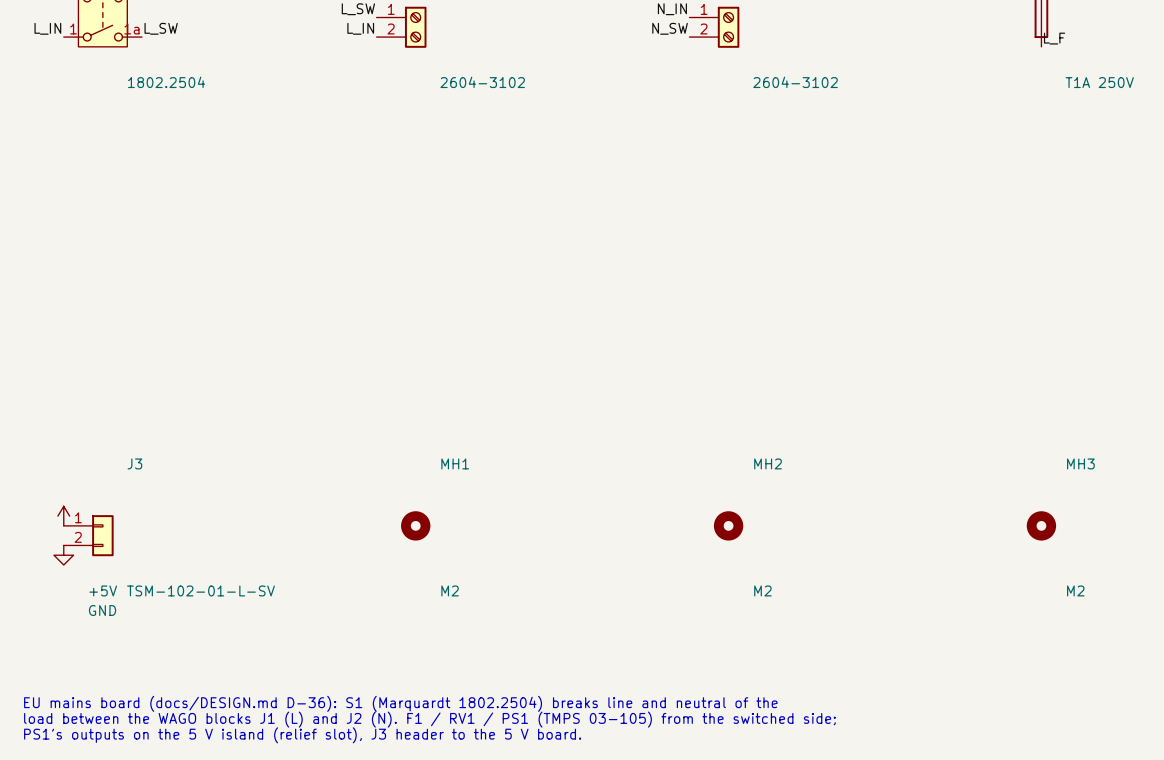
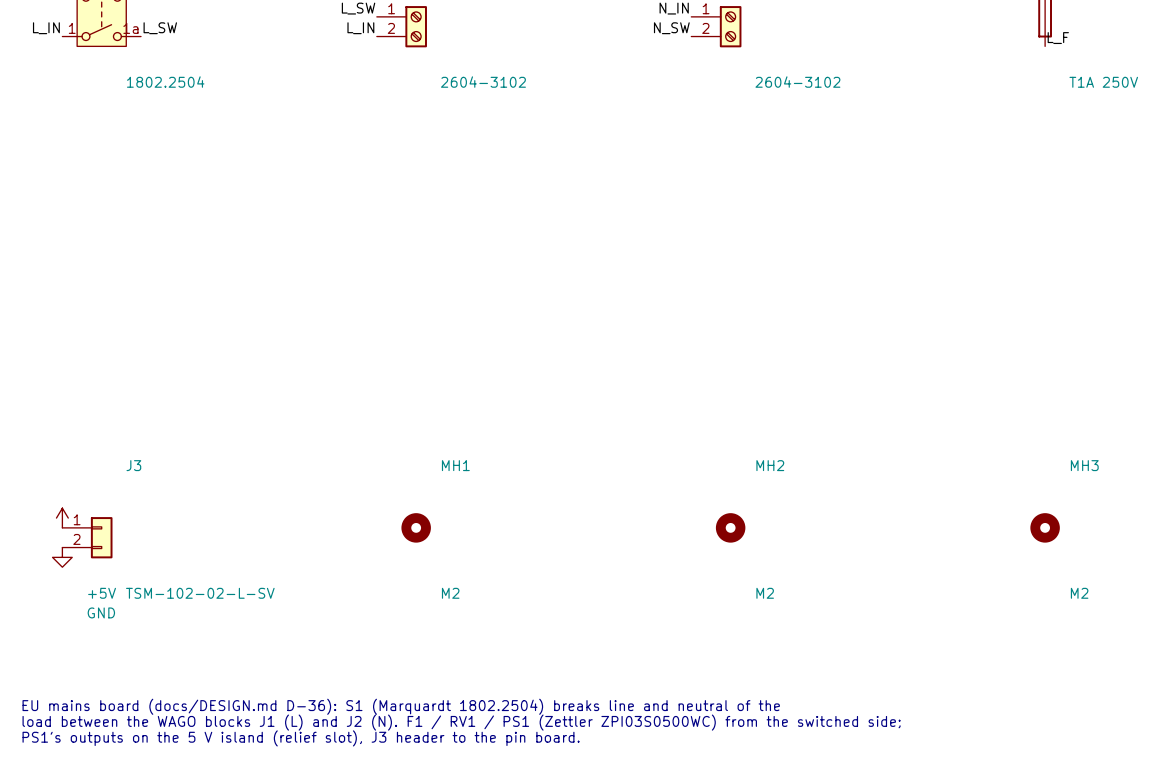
J3 value: TSM-102-01-L-SV (200, 590) -> TSM-102-02-L-SV (200, 593)
text: load between the WAGO blocks J1 (L) and J2 (N). F1 / RV1 / PS1 (TMPS 03-105) from the switched side; (429, 719) -> load between the WAGO blocks J1 (L) and J2 (N). F1 / RV1 / PS1 (Zettler ZPI03S0500WC) from the switched side; (461, 722)
text: PS1's outputs on the 5 V island (relief slot), J3 header to the 5 V board. (302, 735) -> PS1's outputs on the 5 V island (relief slot), J3 header to the pin board. (301, 738)

